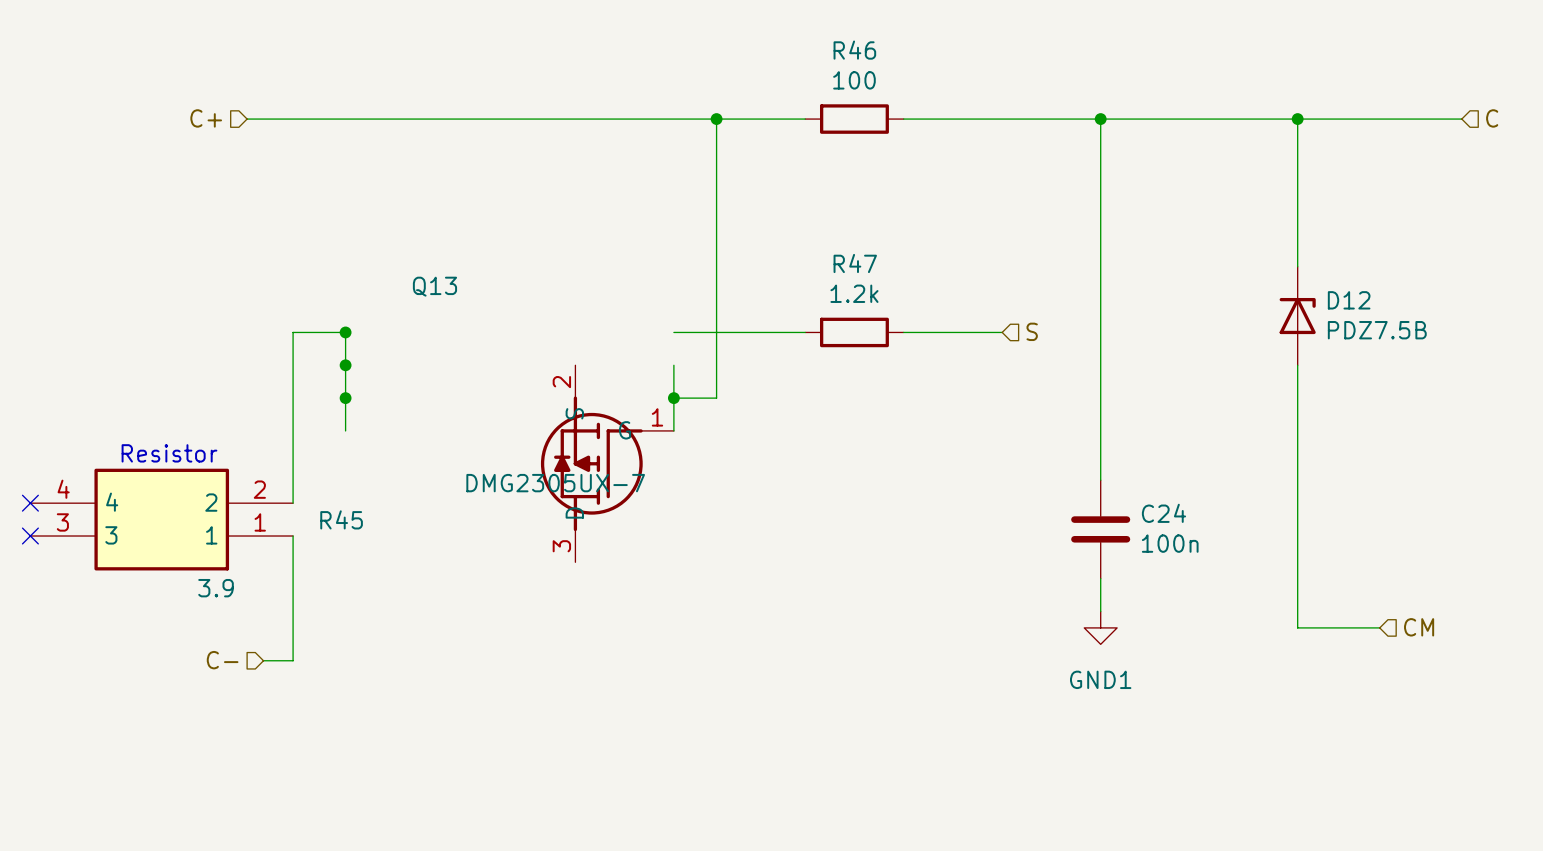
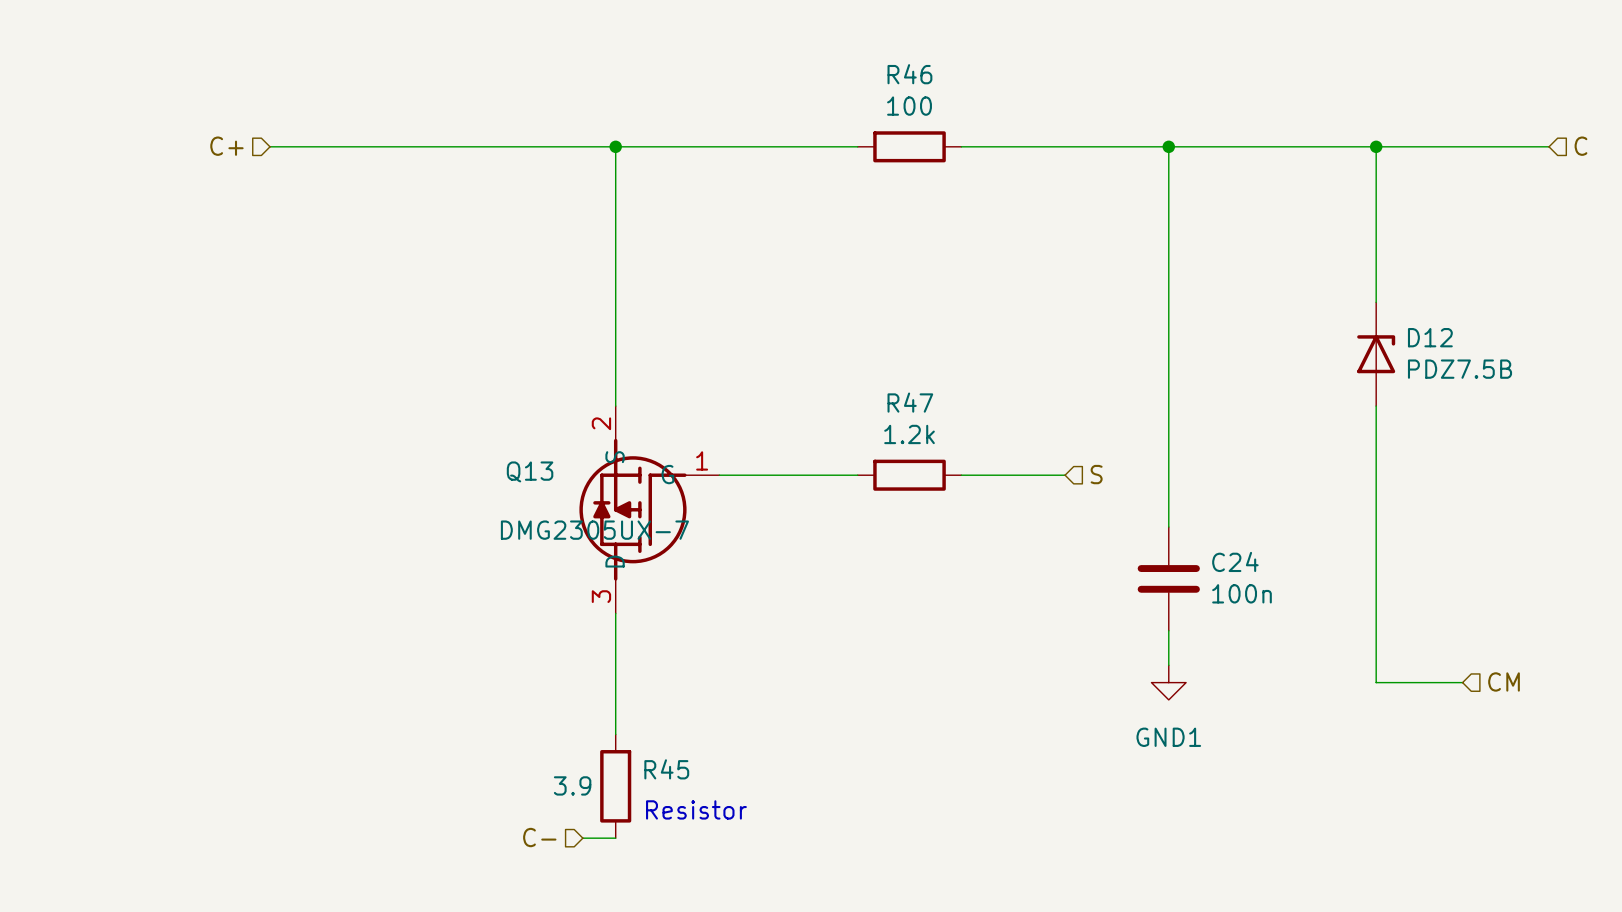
wire: none -> (615, 146) (615, 406)
junction: none -> (615, 146)
wire: (716, 119) (716, 398) (673, 398) -> none
junction: (716, 119) -> none
Q13 name position: Q13 (434, 286) -> Q13 (530, 471)
hierarchical label position: S (1032, 331) -> S (1096, 474)
junction: (345, 332) -> none
wire: (673, 332) (805, 332) -> none
R47 position: (854, 332) -> (909, 475)
wire: (903, 332) (1002, 332) -> (961, 475) (1065, 475)
junction: (345, 365) -> none
wire: (673, 365) (673, 430) -> (857, 475) (719, 475)
junction: (345, 398) -> none
junction: (673, 398) -> none
wire: (345, 430) (345, 332) (293, 332) (293, 503) -> none
text: Resistor (169, 453) -> none
R45 symbol: [30, 468, 294, 571] -> [600, 734, 632, 839]
no-connect mark: (30, 503) -> none
R45 name position: R45 (341, 519) -> R45 (666, 769)
no-connect mark: (30, 536) -> none
wire: (293, 536) (293, 660) (263, 660) -> none
wire: none -> (615, 613) (615, 734)
R45 value position: 3.9 (216, 588) -> 3.9 (572, 785)
hierarchical label position: C- (222, 660) -> C- (539, 837)
text: none -> Resistor (696, 809)
wire: none -> (582, 838) (615, 838)

